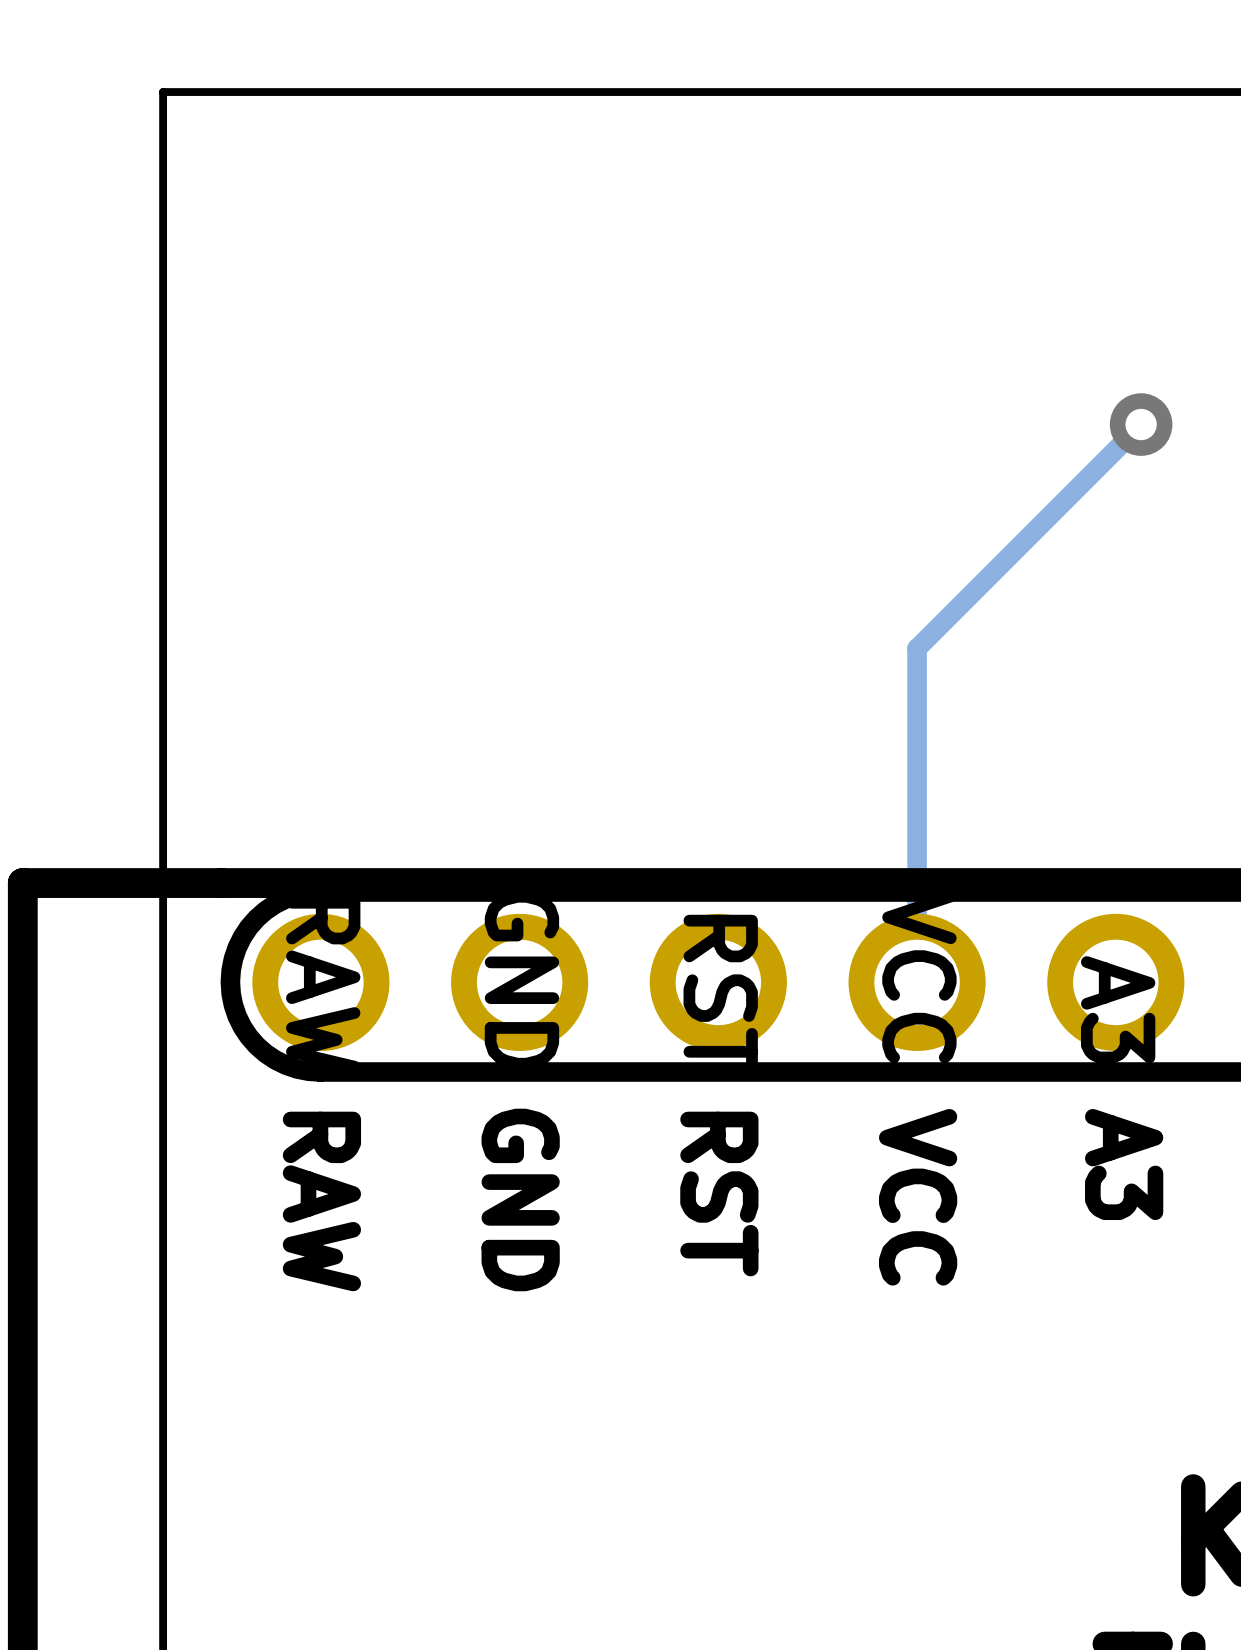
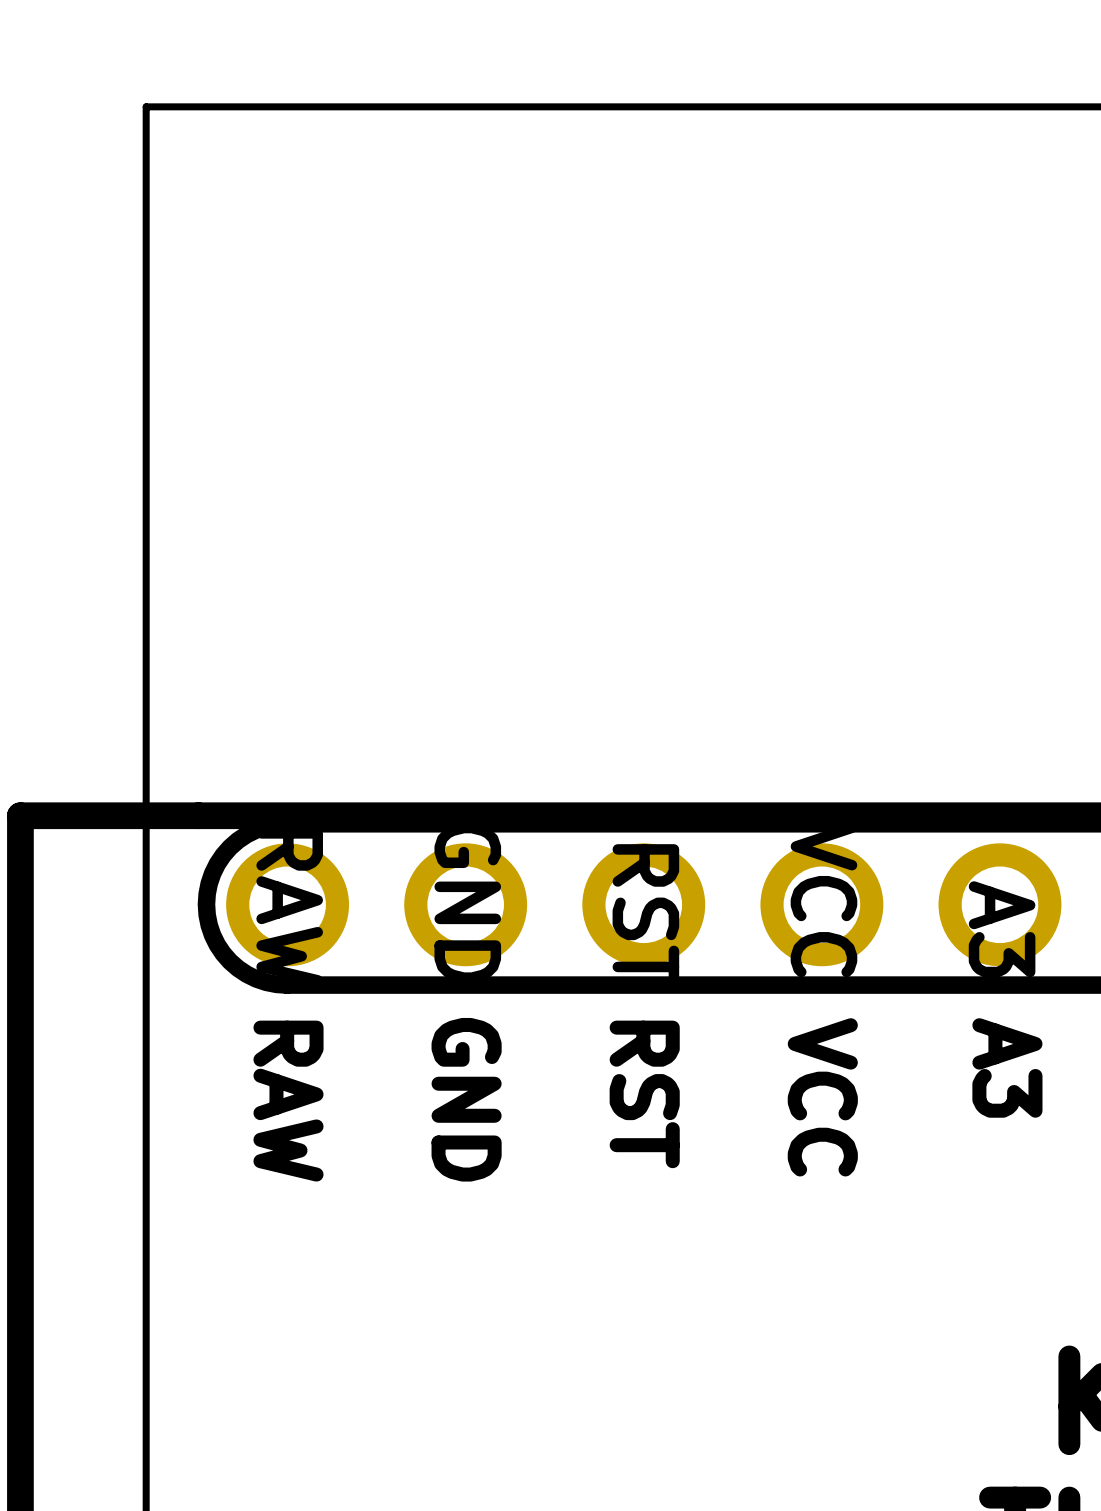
track: (1141, 424) (917, 648) (917, 982) -> none
via: (1141, 424) -> none

